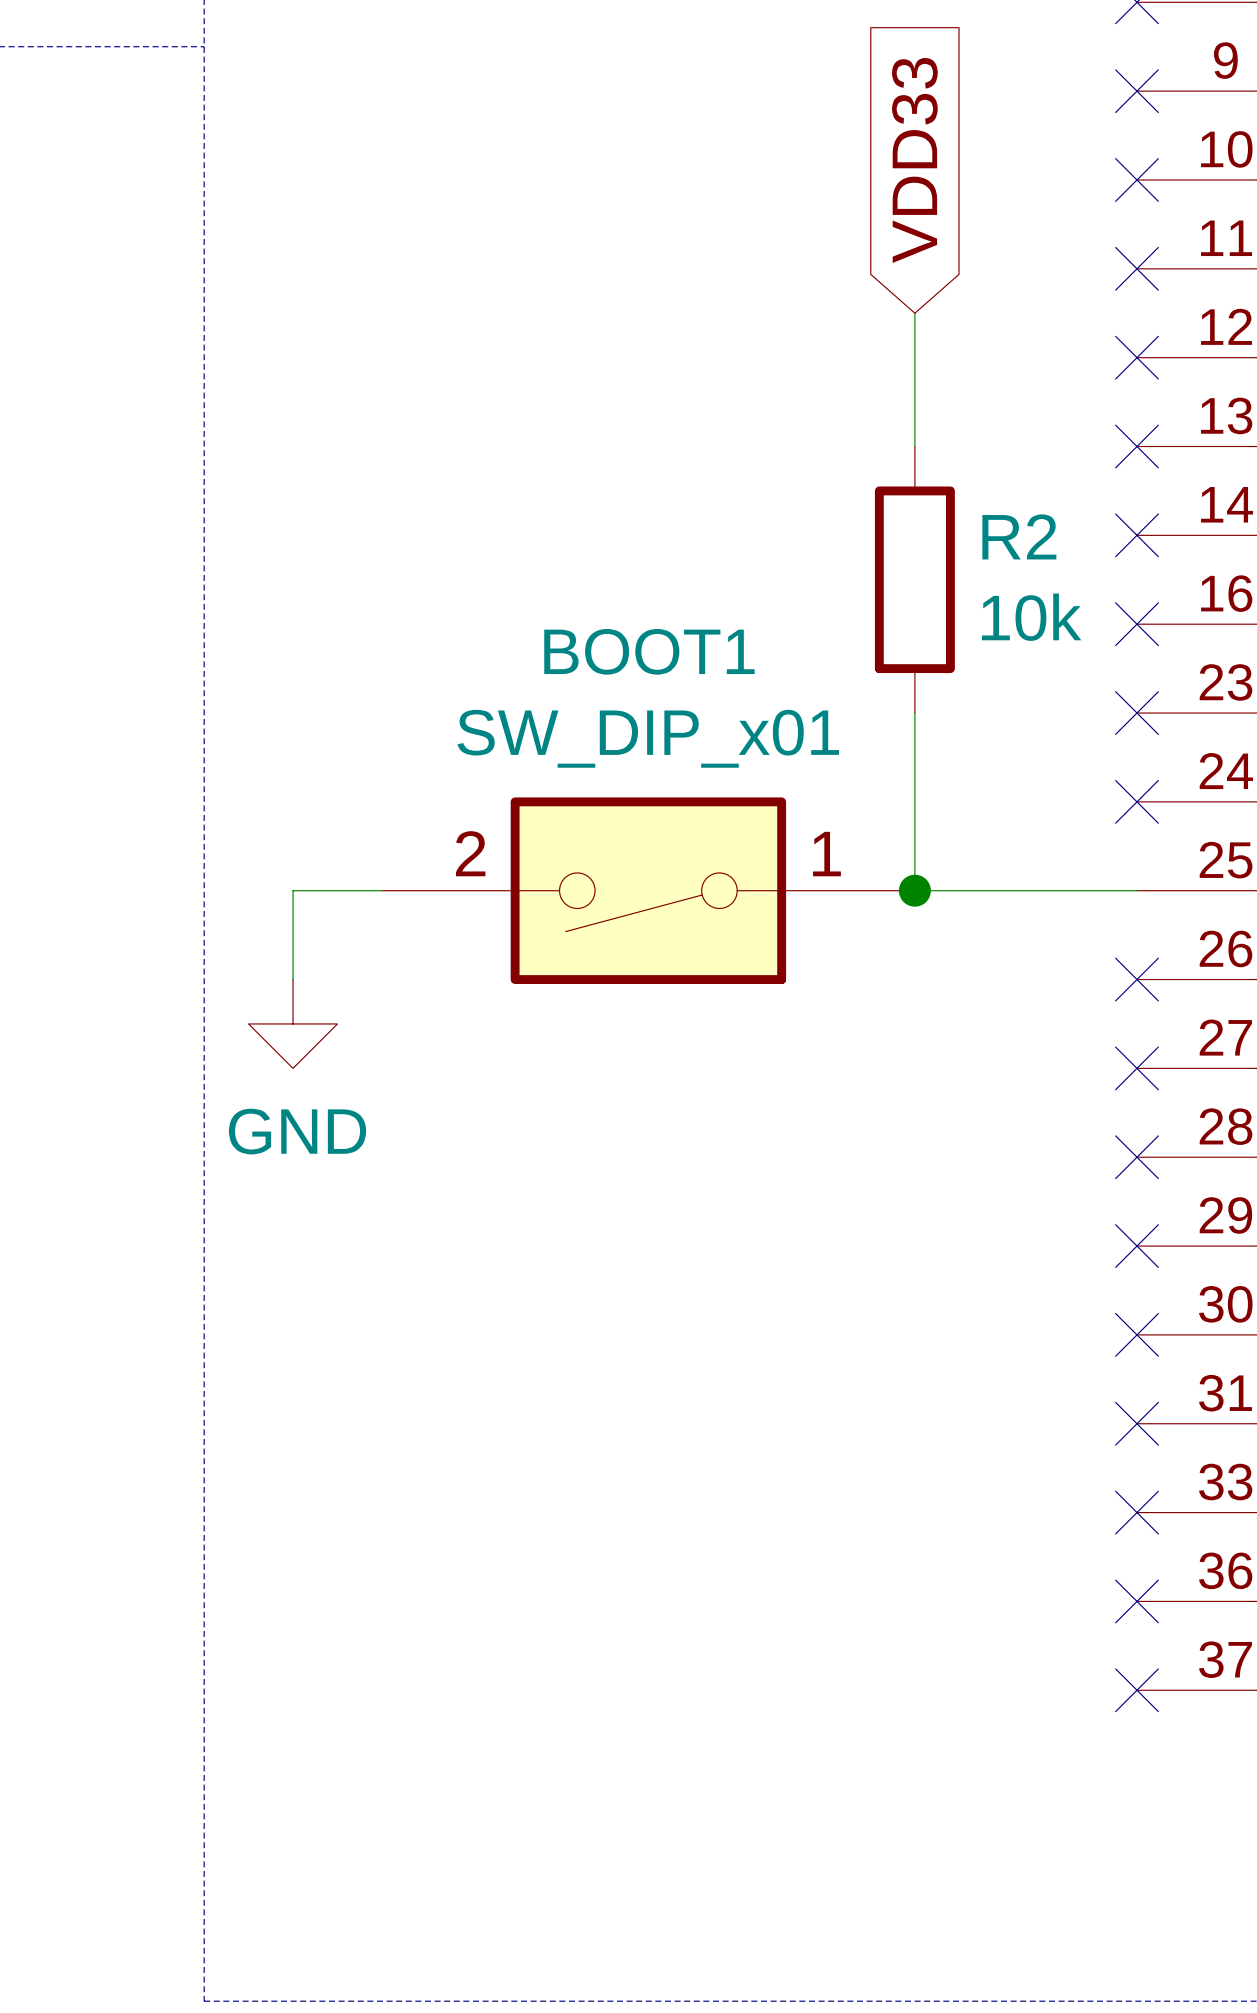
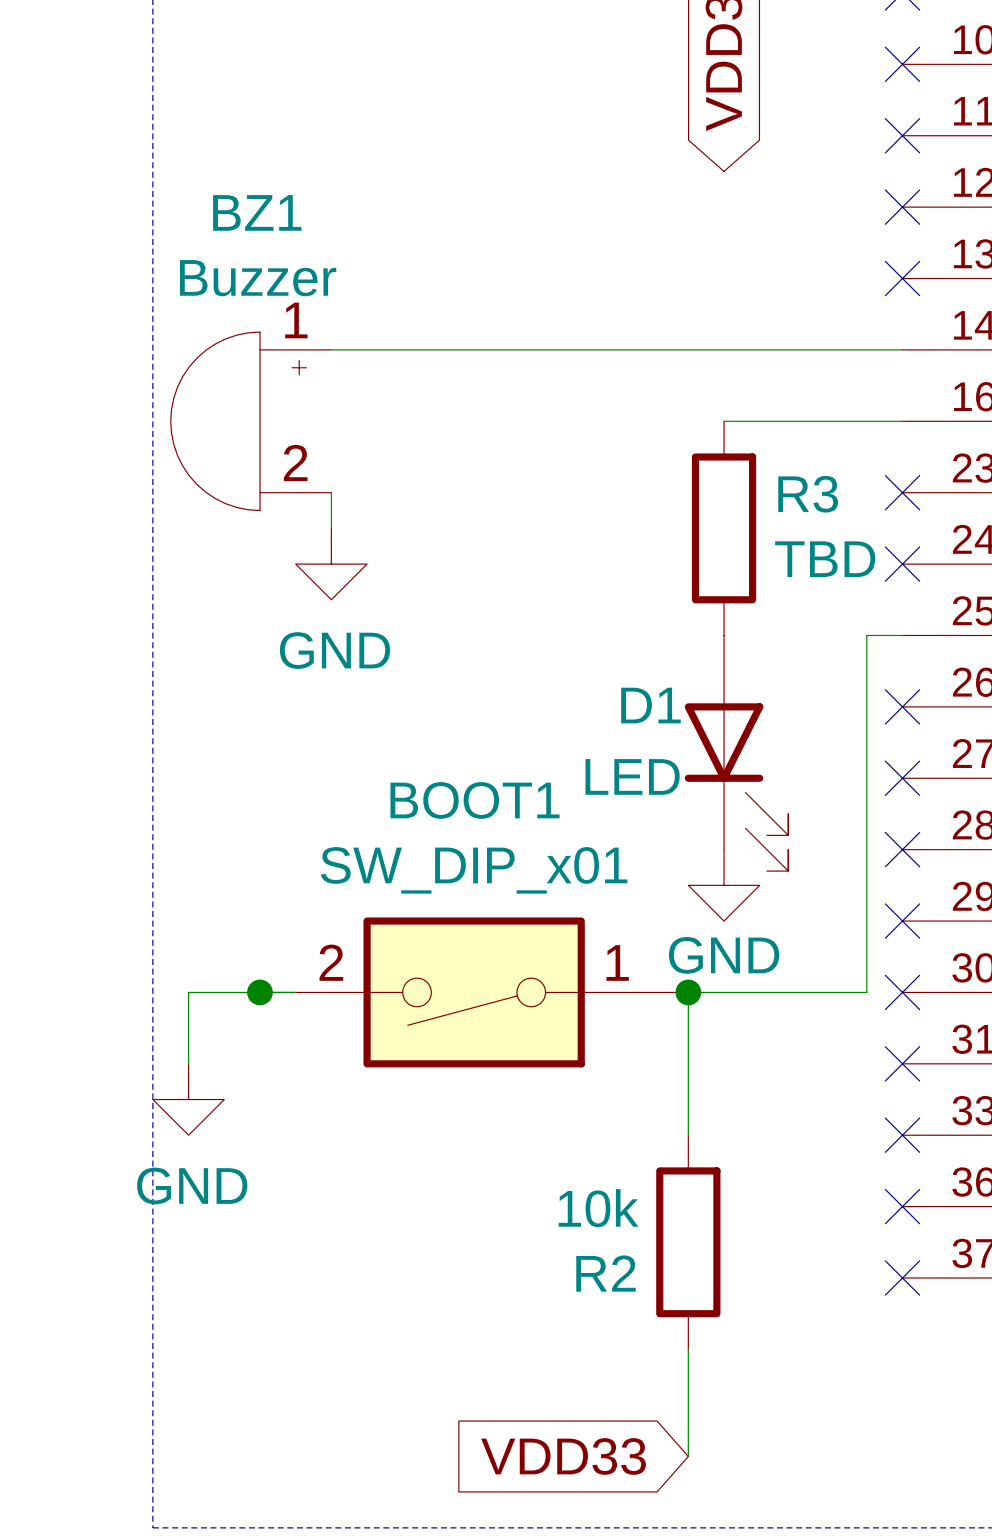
wire: (914, 313) (914, 446) -> none
wire: none -> (331, 349) (902, 349)
no-connect mark: (1136, 535) -> none
R2 name position: R2 (1019, 536) -> R2 (606, 1273)
R2 position: (914, 579) -> (688, 1242)
R2 value position: 10k (1031, 617) -> 10k (598, 1208)
BZ1: none -> Buzzer (251, 421)
wire: none -> (724, 421) (902, 421)
no-connect mark: (1136, 624) -> none
wire: none -> (331, 492) (331, 528)
wire: (914, 713) (914, 890) (1092, 890) -> (688, 1135) (688, 992) (866, 992) (866, 635)
R3: none -> TBD (724, 528)
power symbol: none -> GND (331, 564)
wire: (381, 890) (293, 890) (293, 979) -> none
BOOT1 position: (648, 890) -> (474, 992)
junction: (914, 890) -> none
power symbol: GND (293, 1023) -> none
D1: none -> LED (736, 753)
power symbol: none -> GND (724, 885)
junction: none -> (259, 992)
wire: none -> (295, 992) (188, 992) (188, 1063)
junction: none -> (688, 992)
power symbol: none -> GND (188, 1099)
wire: none -> (688, 1349) (688, 1456)
global label: none -> VDD33 (563, 1456)

